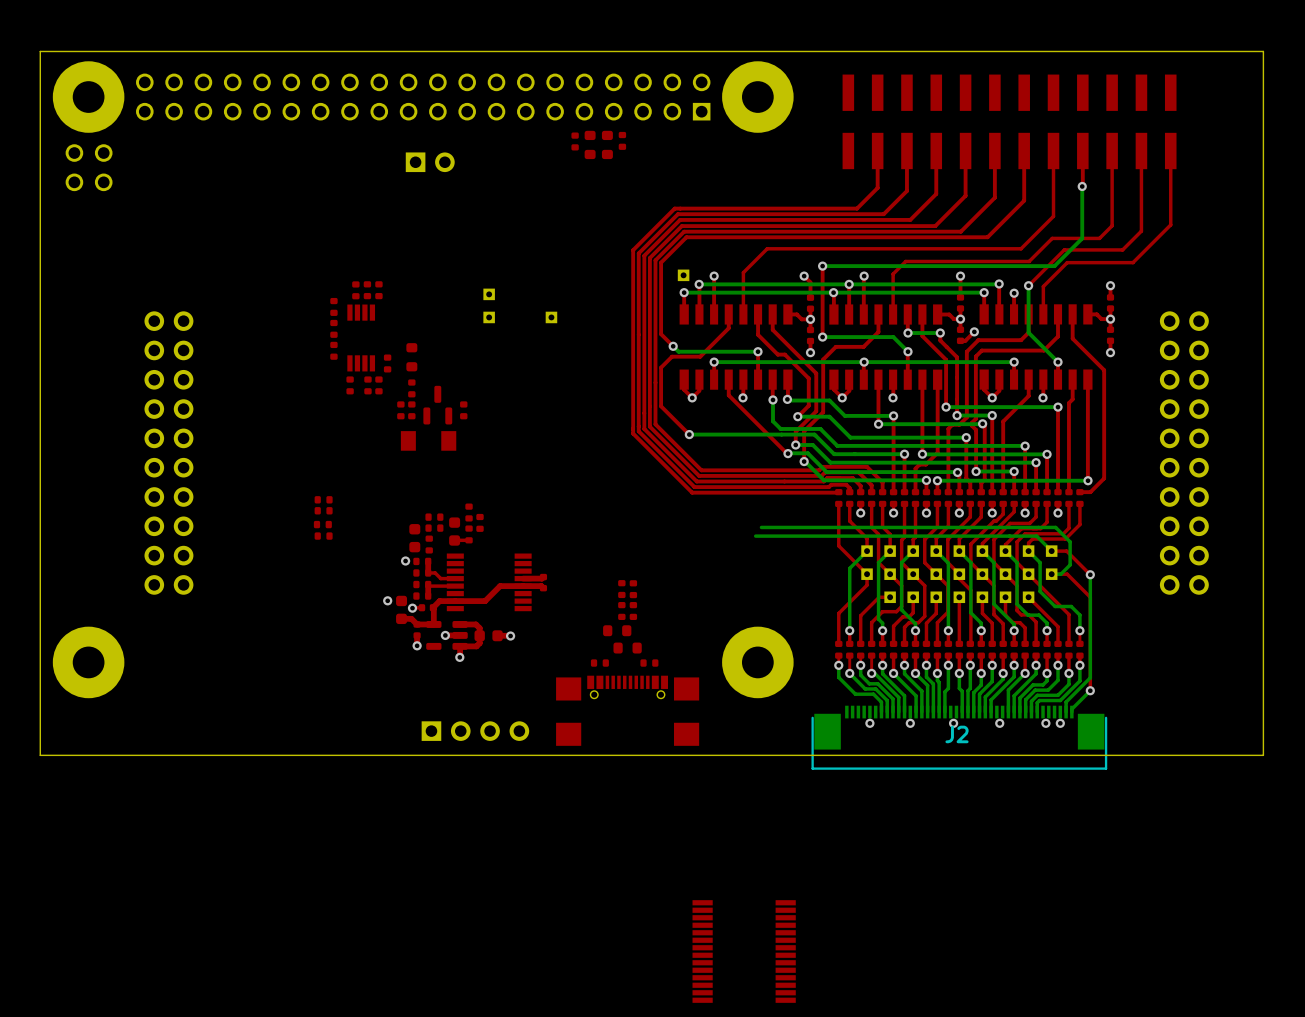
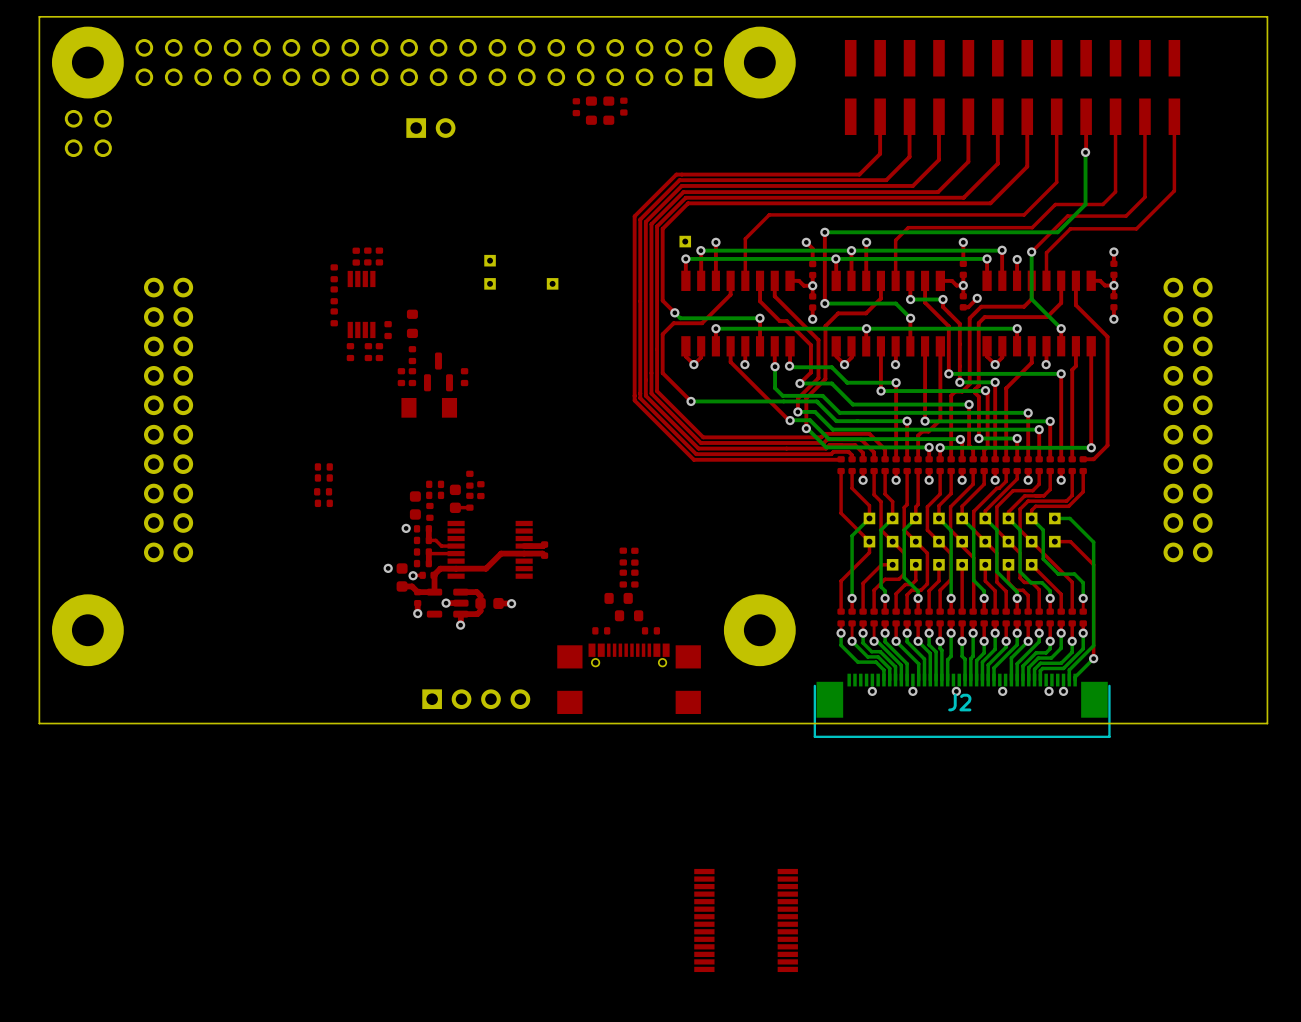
bottom track: (761, 527) (1055, 527) (1070, 541) (1070, 564) (1060, 574) (1051, 574) -> none
bottom track: (755, 536) (1036, 536) (1051, 551) -> (1093, 542) (1069, 518) (1054, 518)
top track: (1051, 551) (1066, 551) (1090, 574) -> none
via: (1090, 574) -> none

